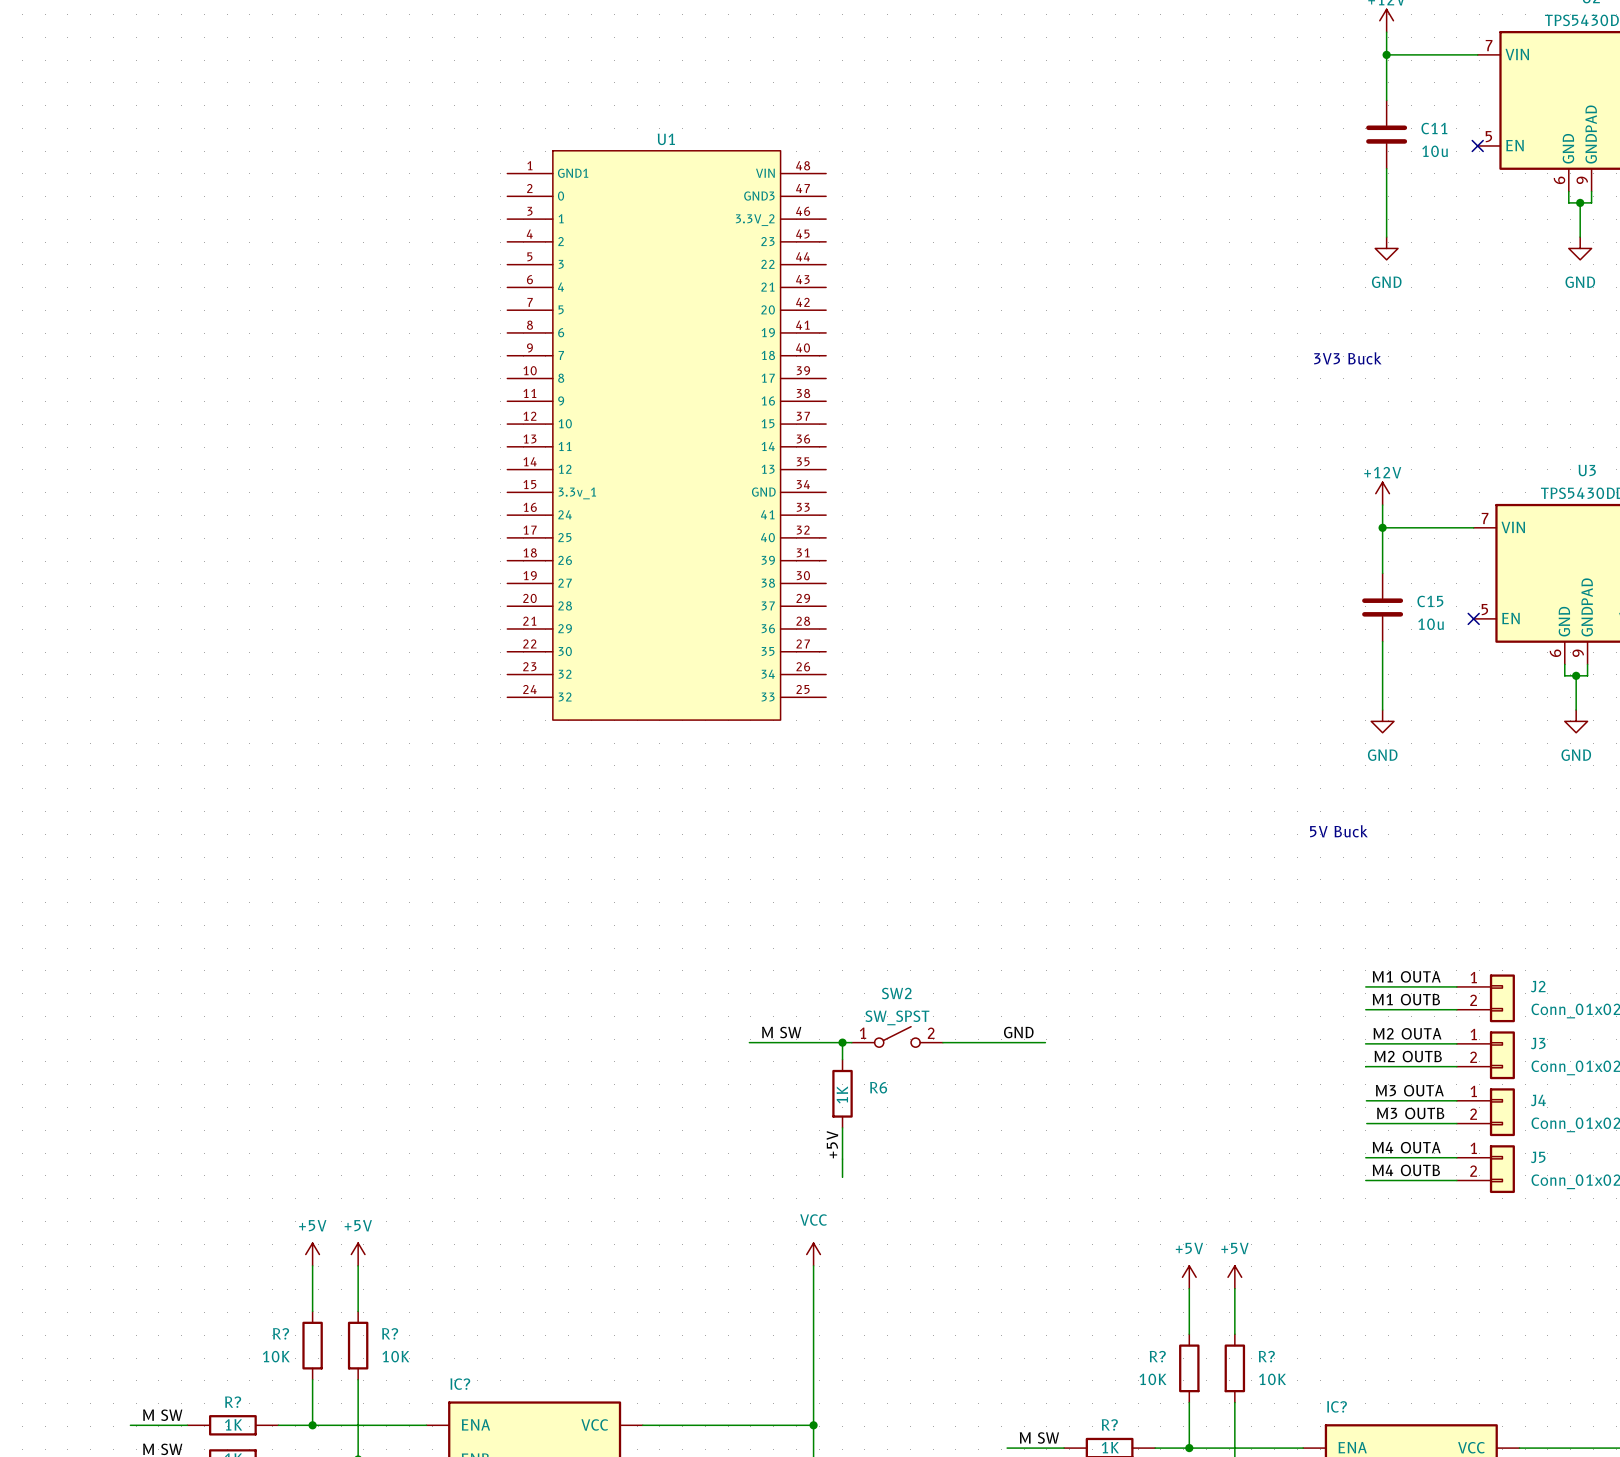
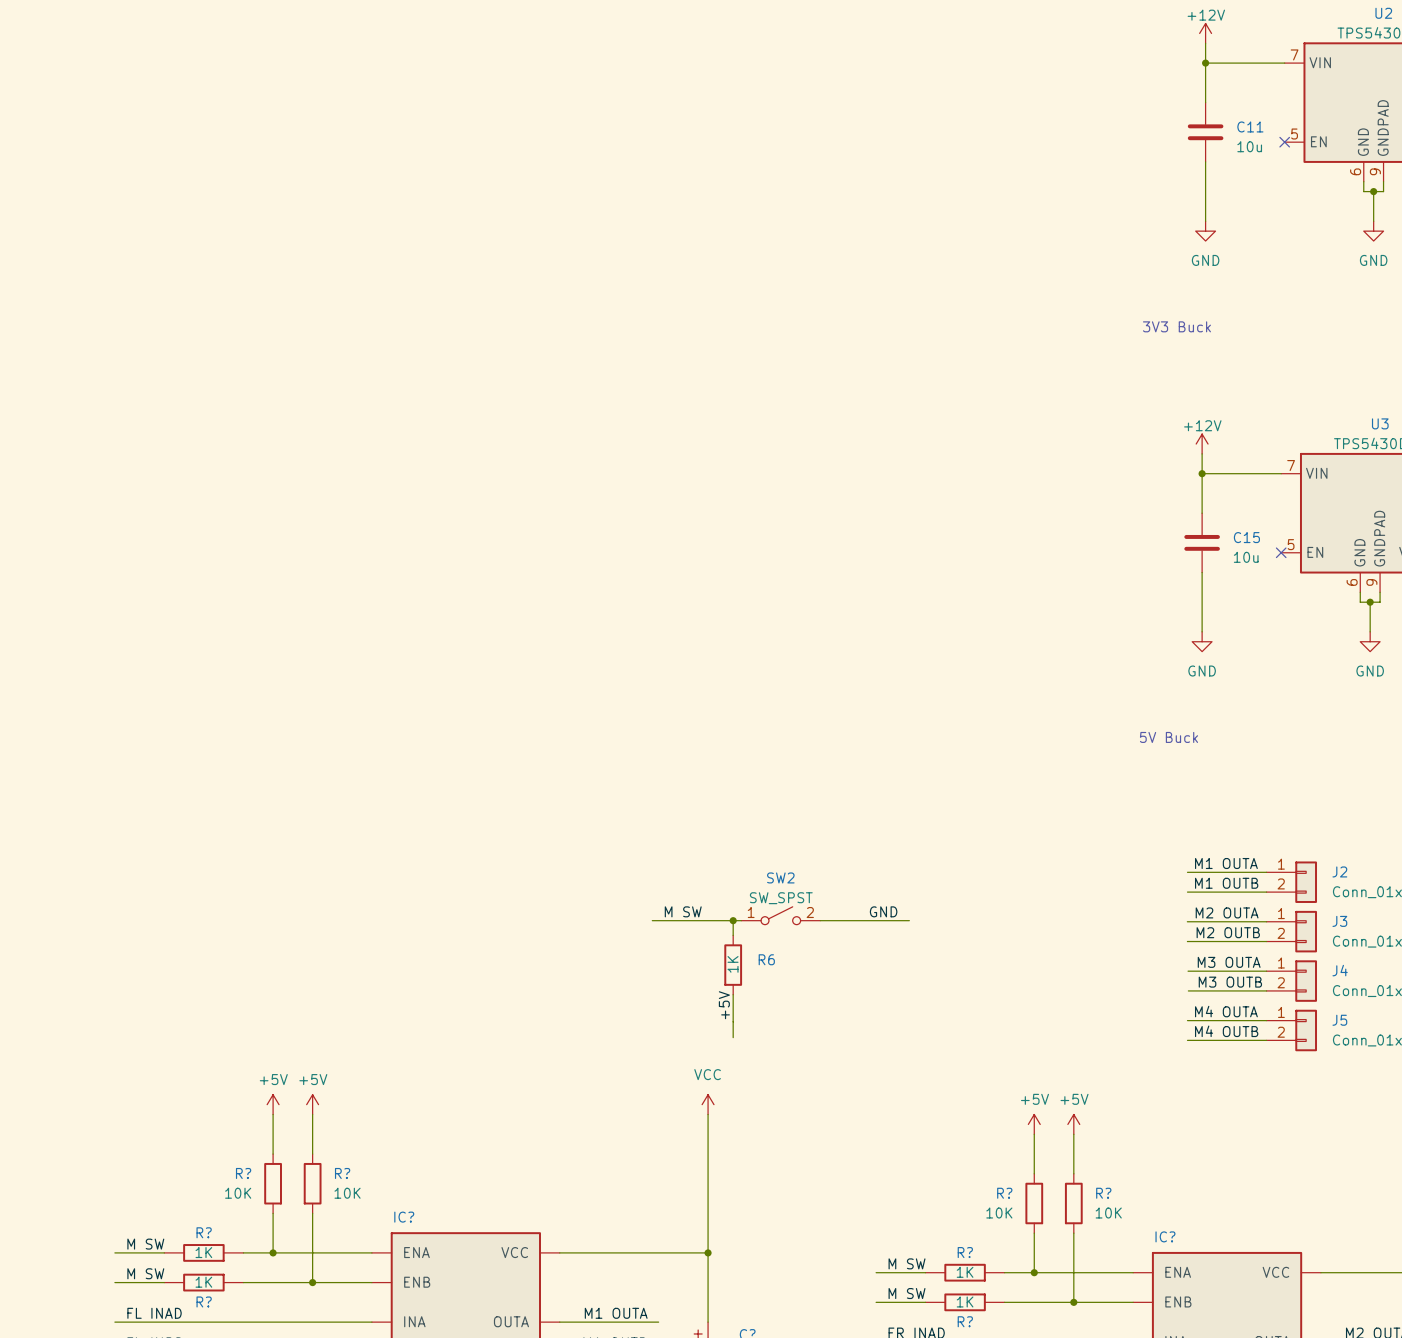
U1: (666, 435) -> none

